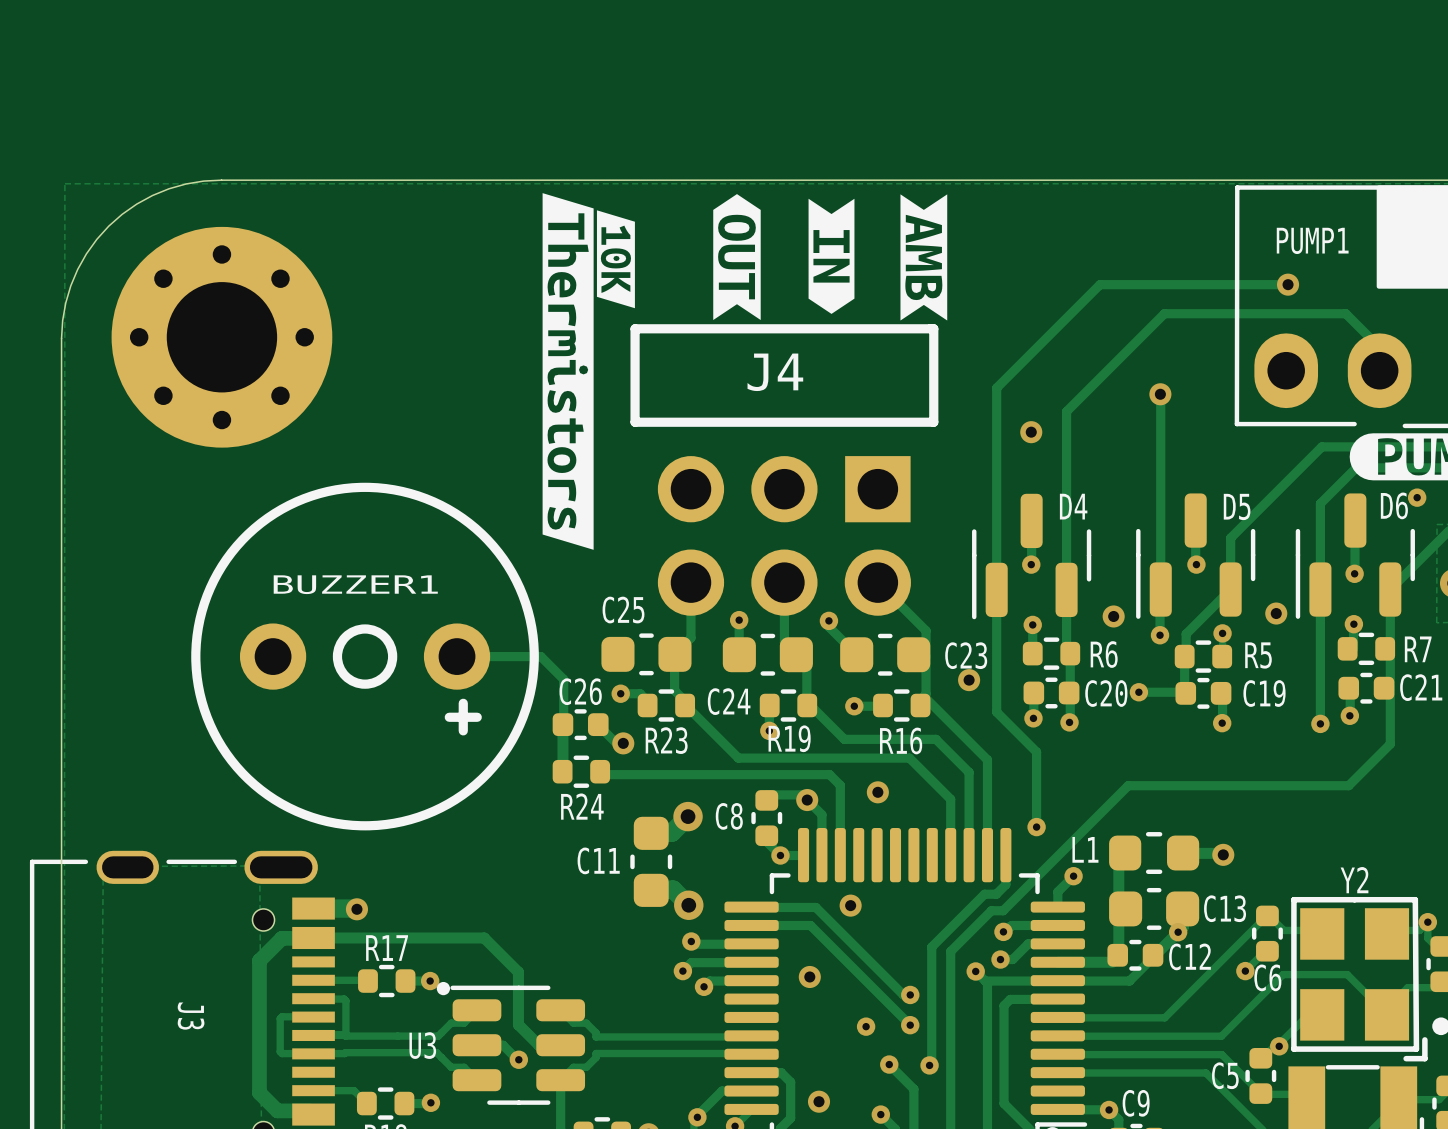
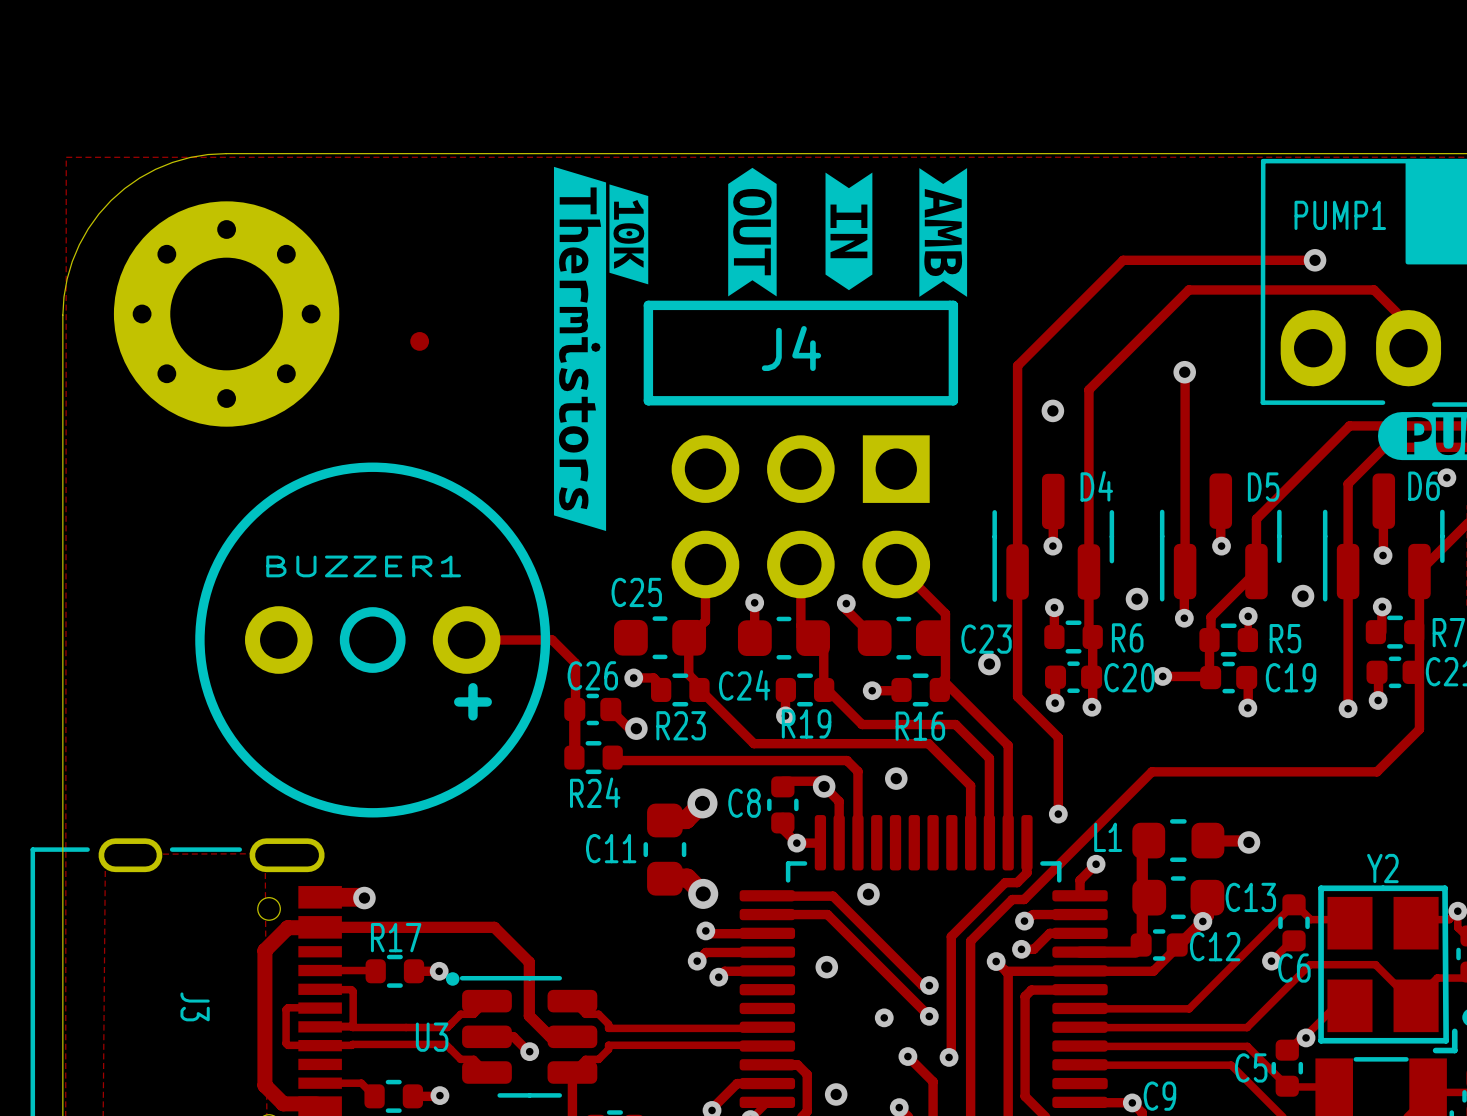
part: none -> (419, 341)

